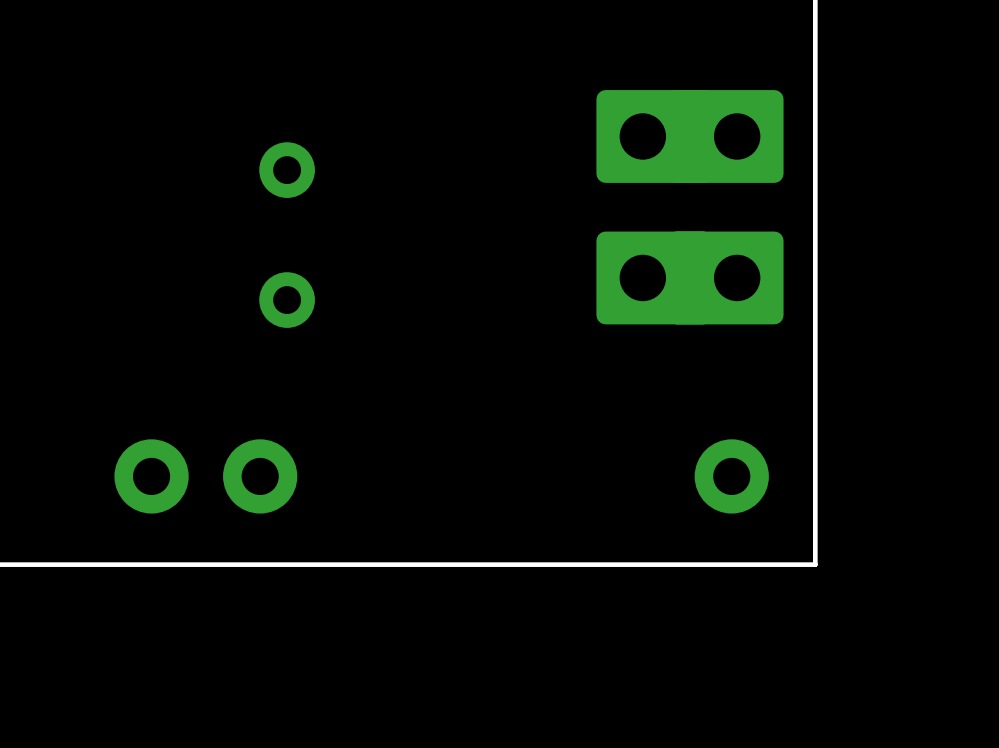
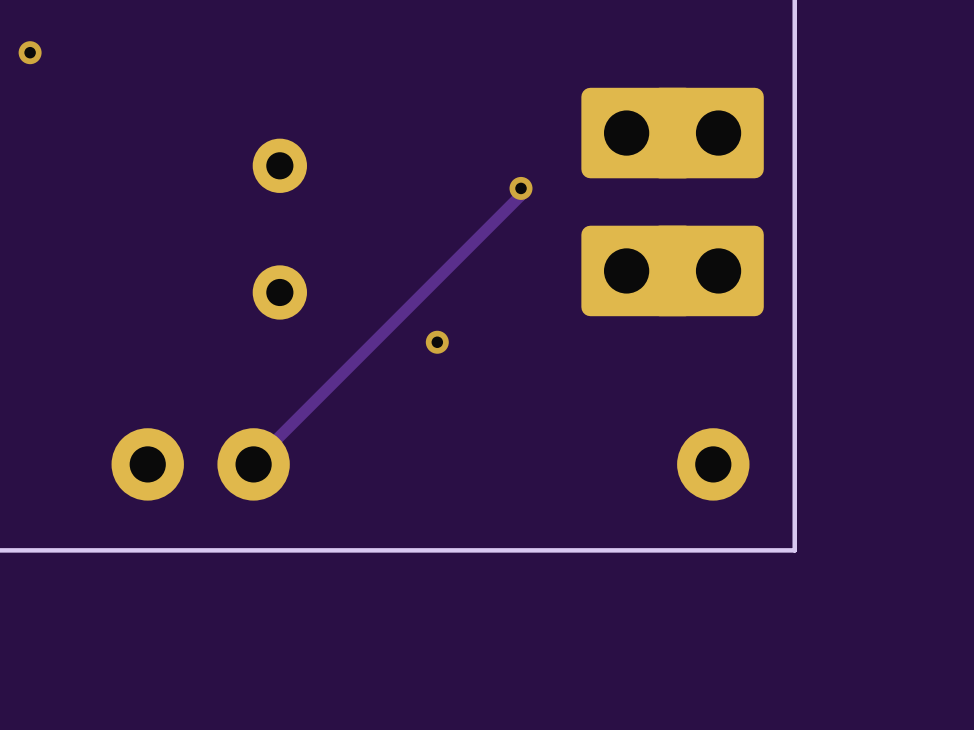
via: none -> (30, 52)
track: none -> (521, 188) (521, 195) (253, 464)
via: none -> (521, 188)
via: none -> (437, 342)

